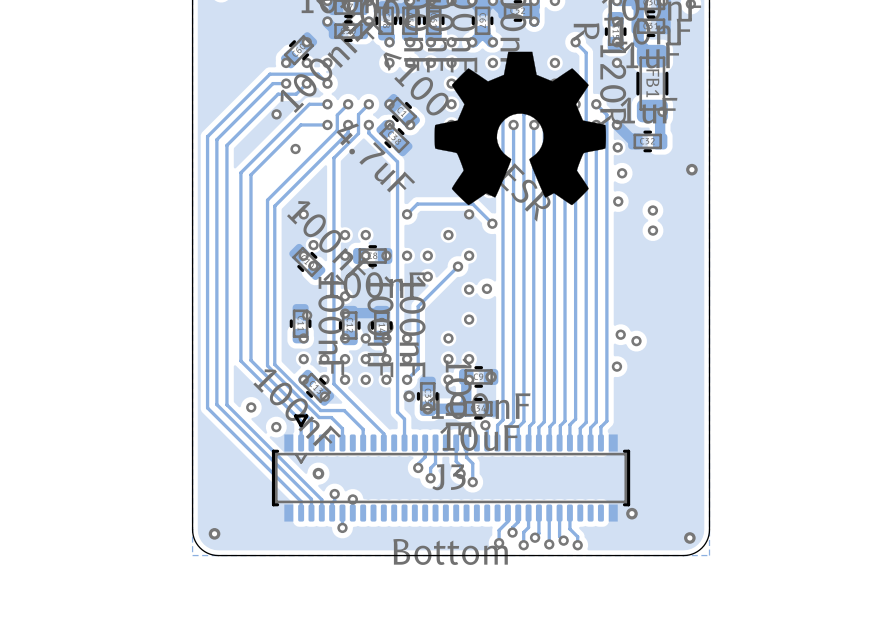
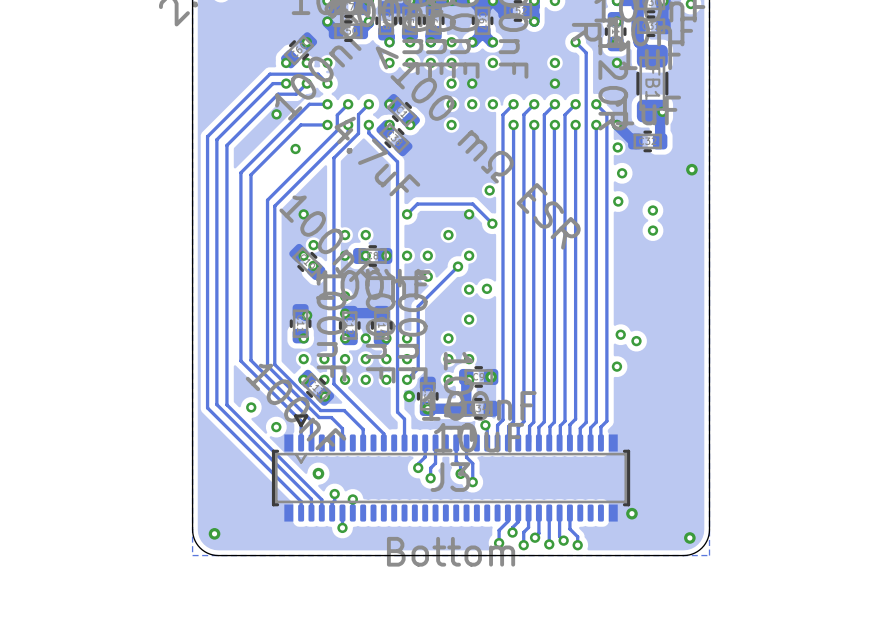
drawing: [434, 51, 606, 206] -> none

